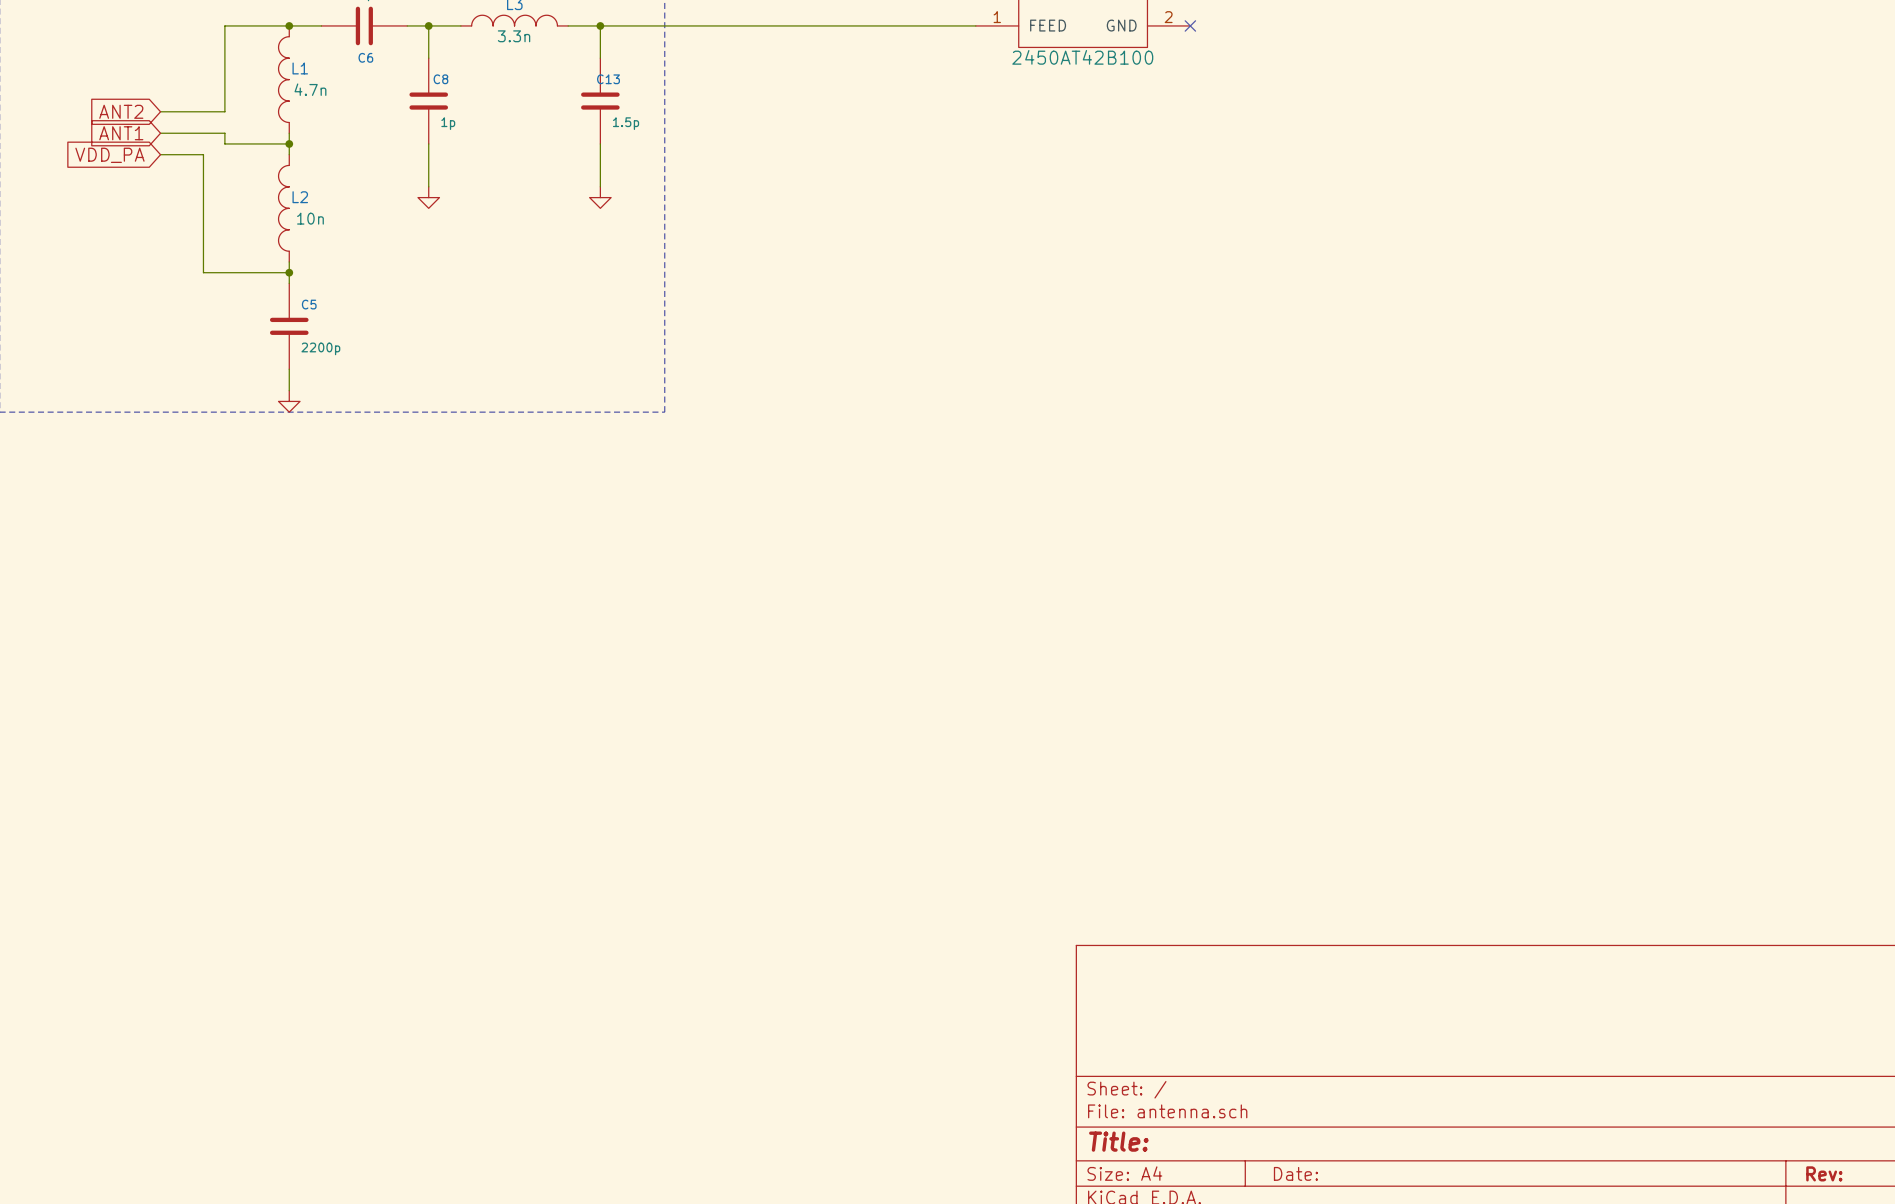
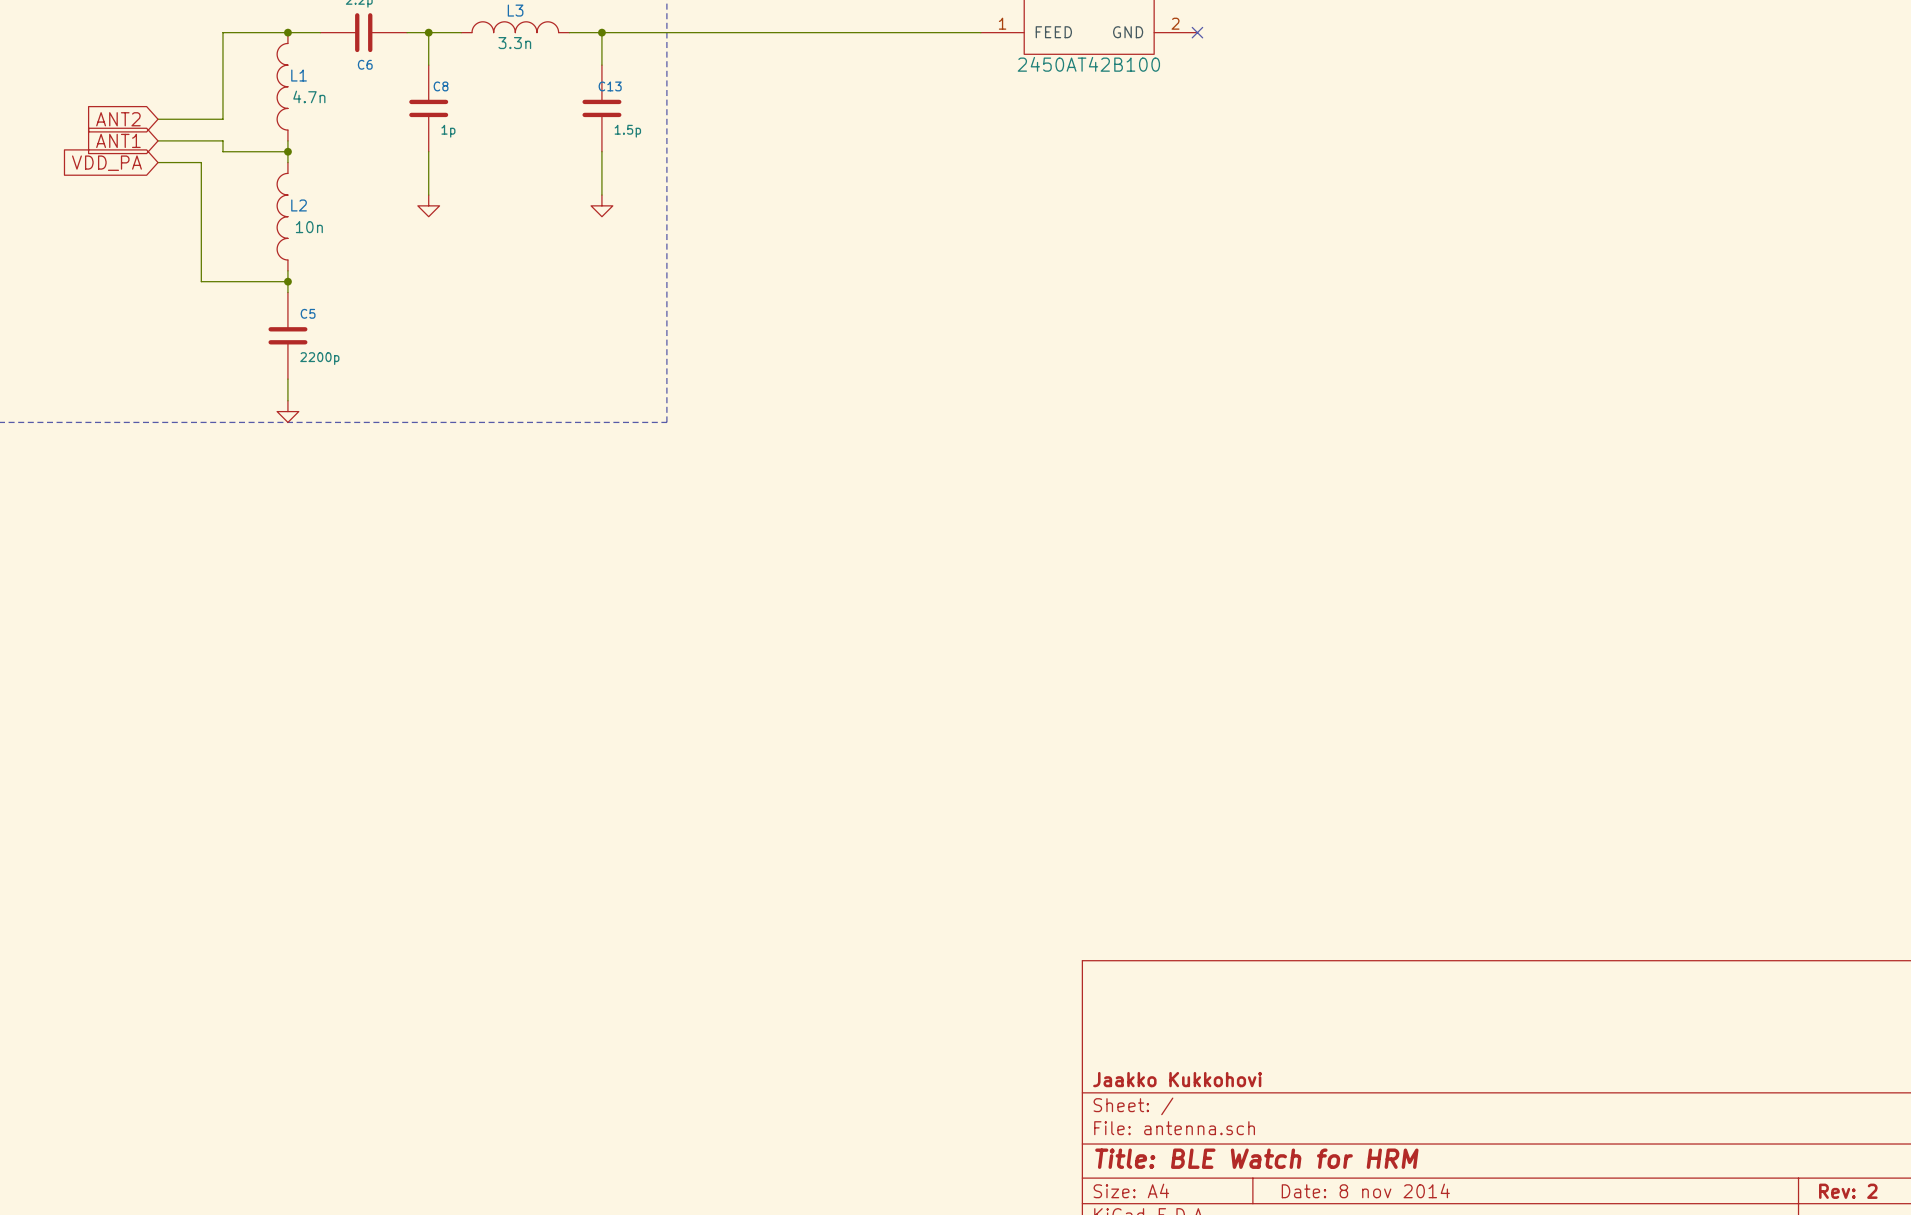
title block: none -> Jaakko Kukkohovi (1177, 1079)
title block: Title: (1118, 1141) -> Title: BLE Watch for HRM (1256, 1158)
title block: Date: (1295, 1173) -> Date: 8 nov 2014 (1365, 1190)
title block: Rev: (1824, 1173) -> Rev: 2 (1848, 1191)

